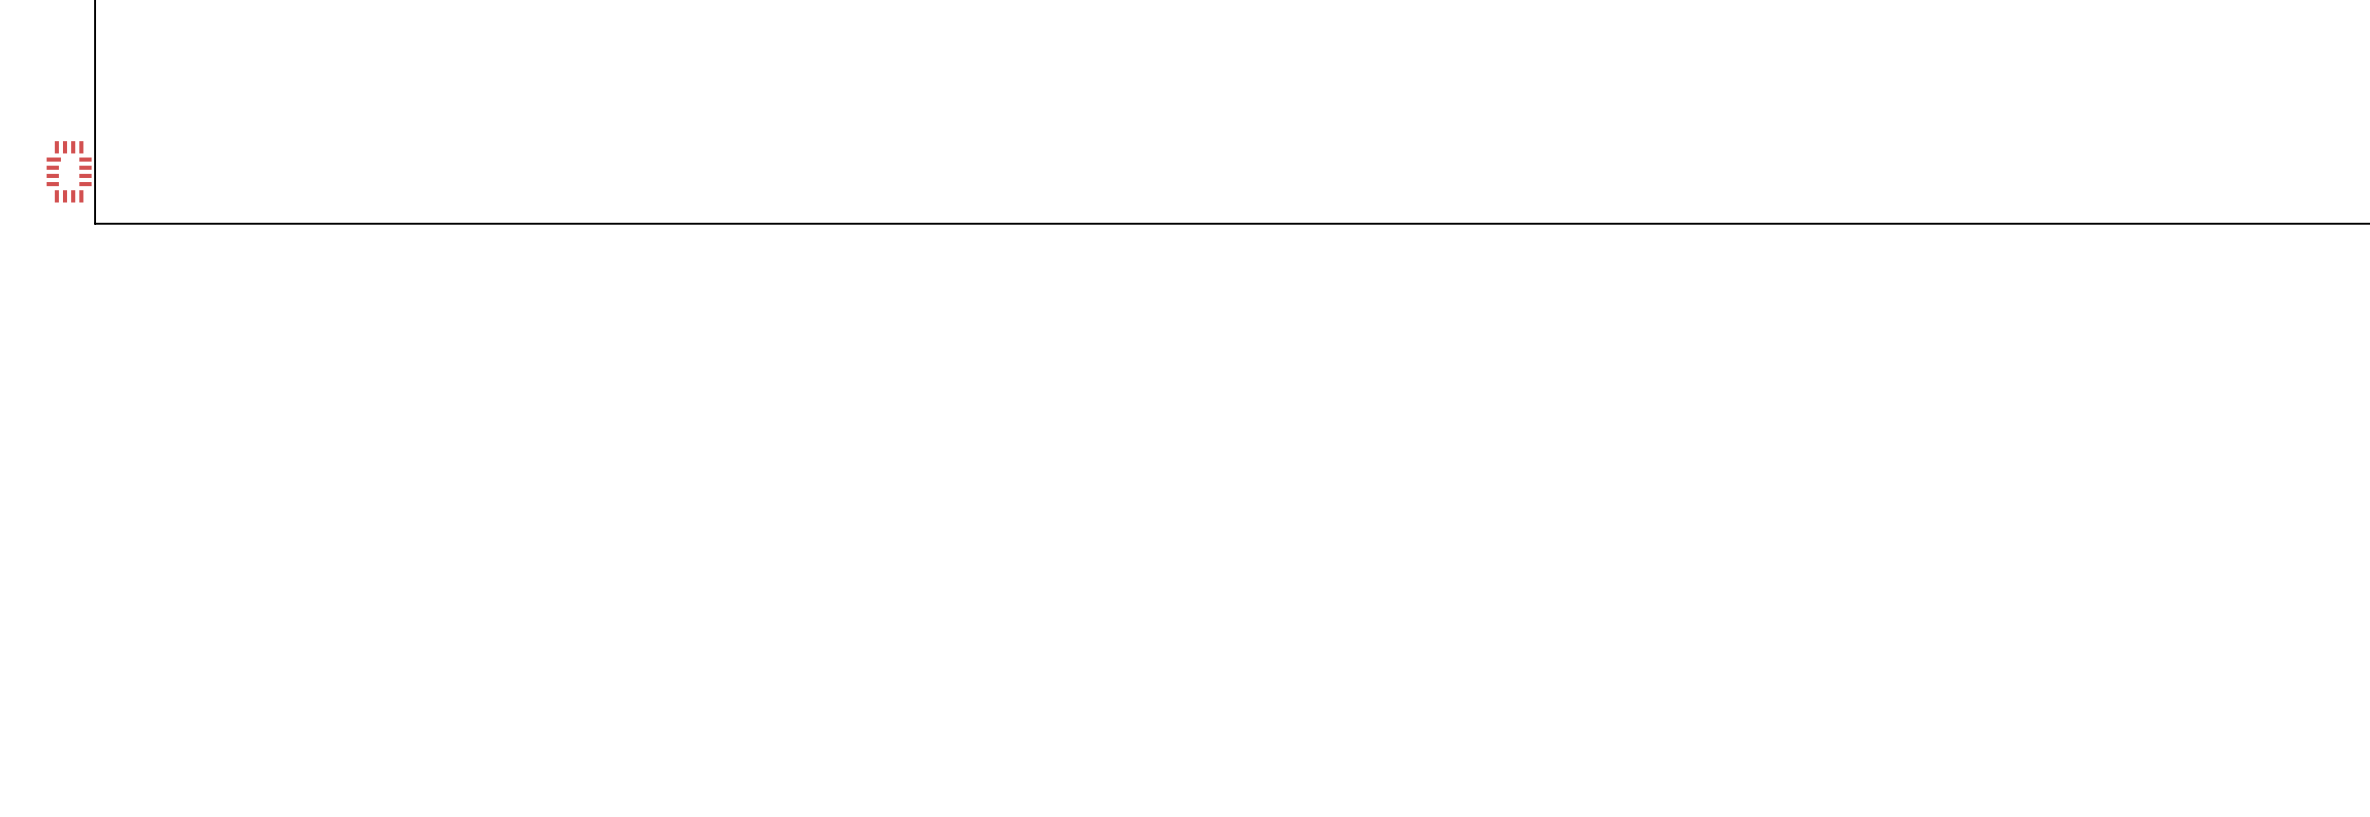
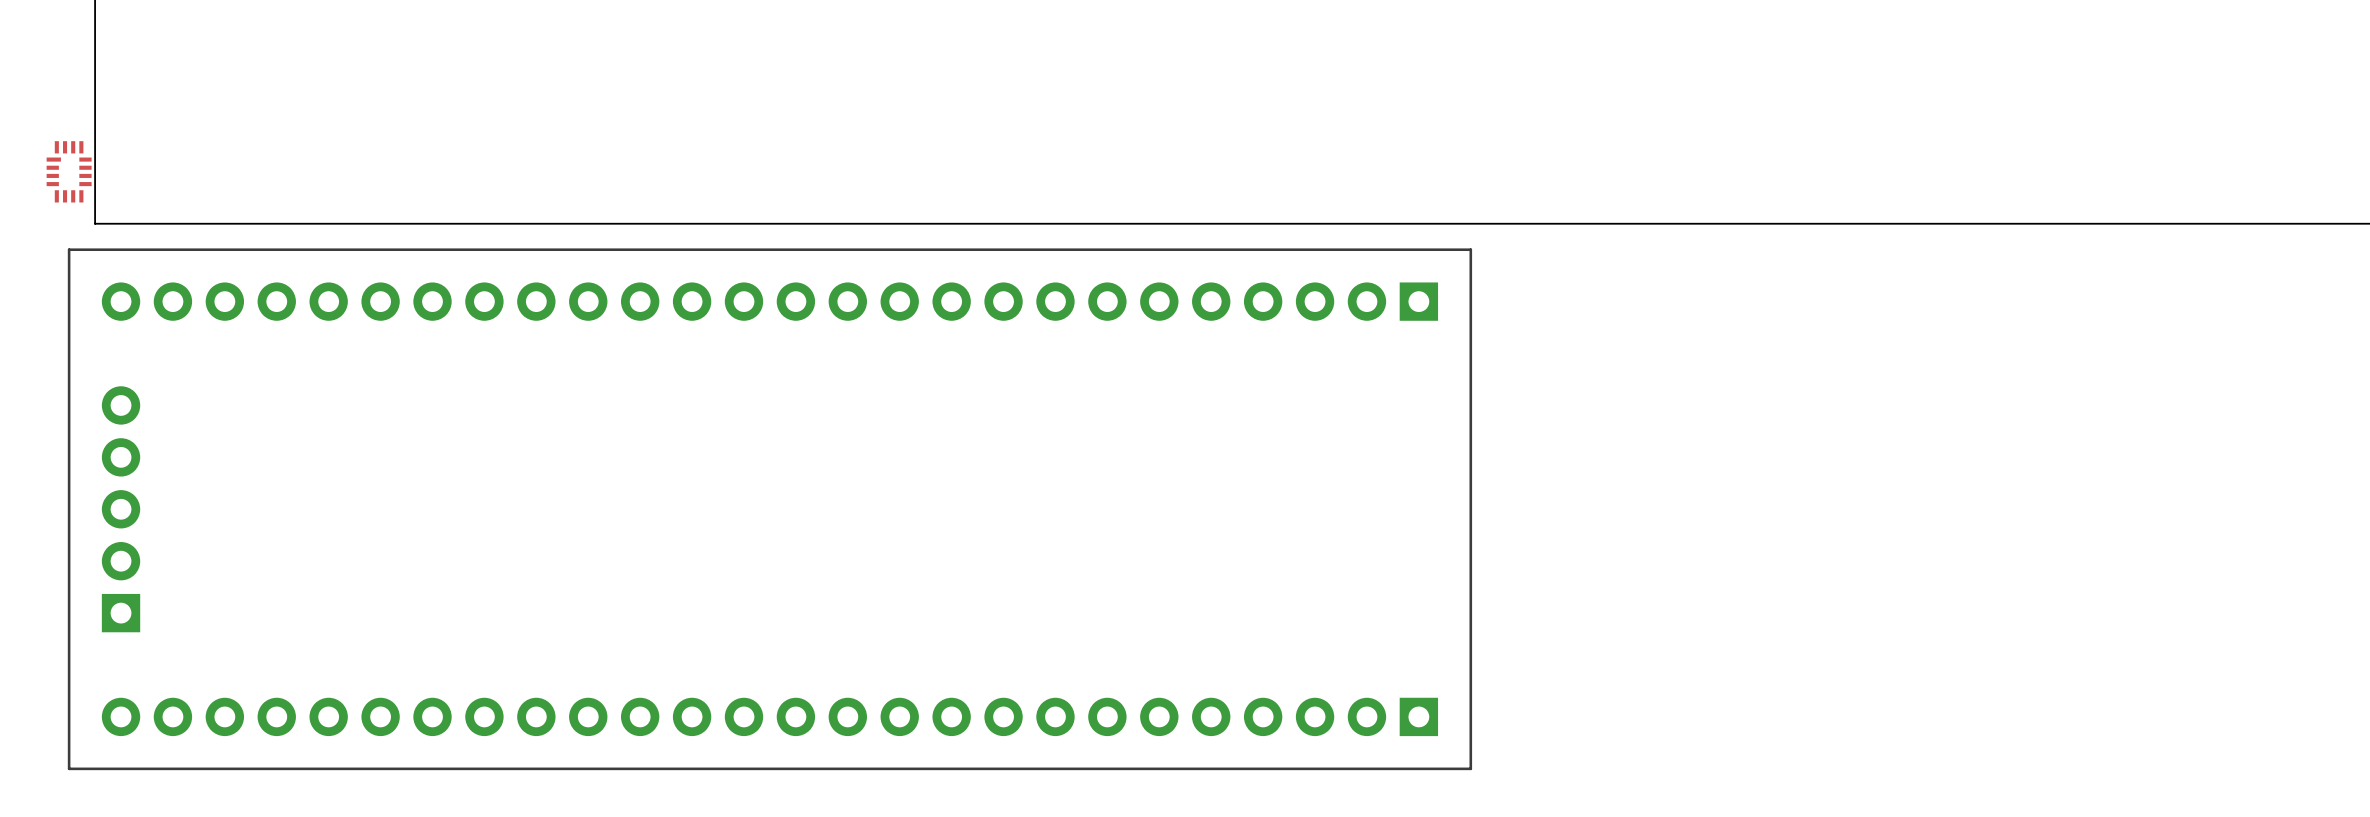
part: none -> (769, 509)

